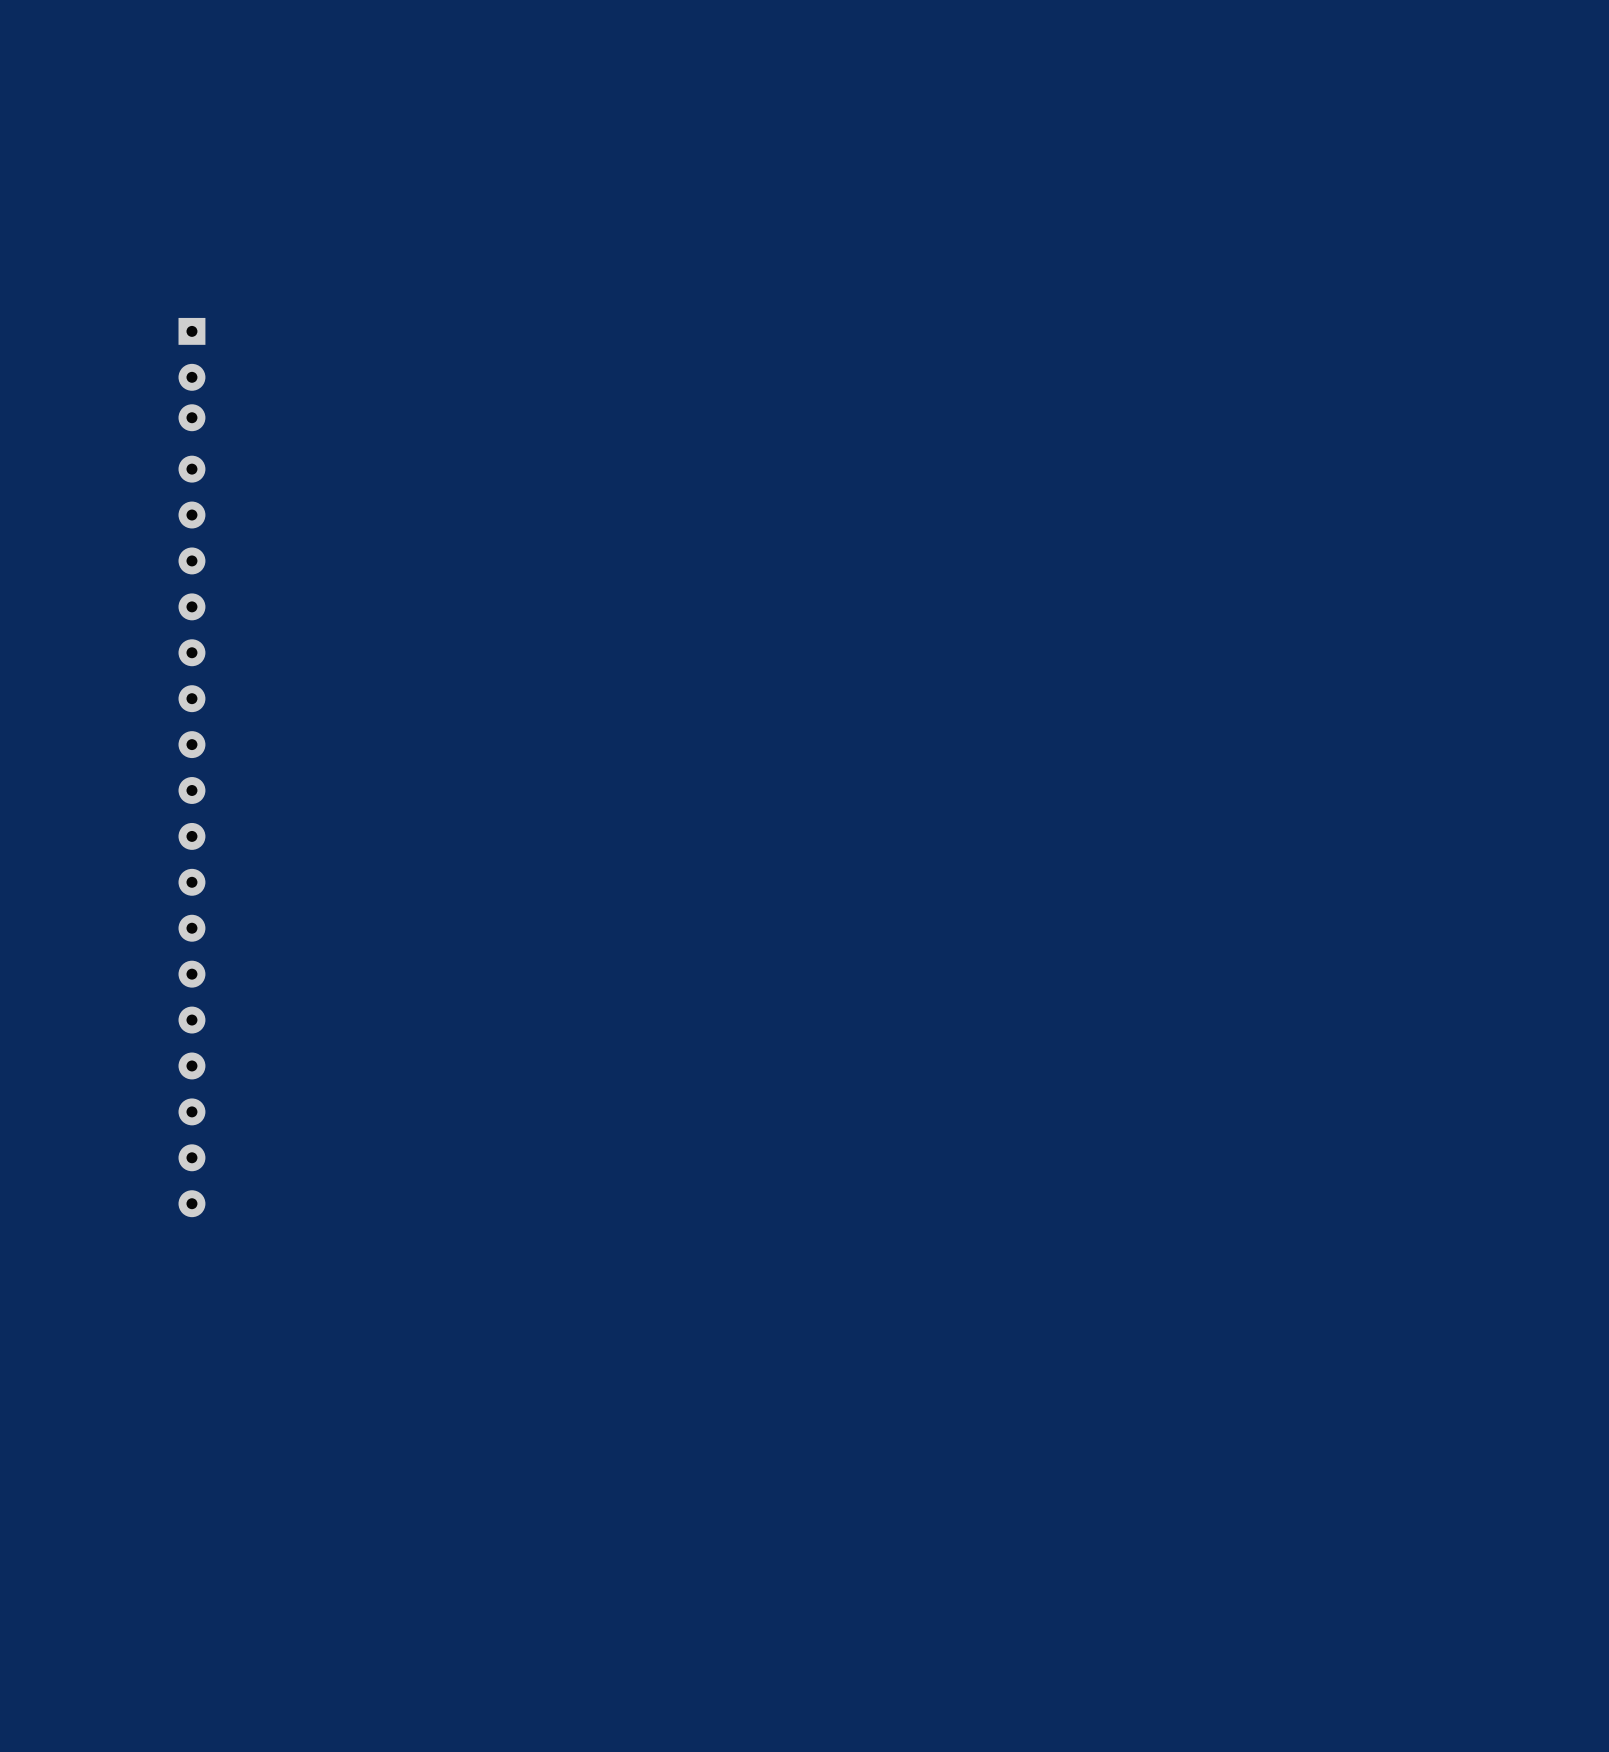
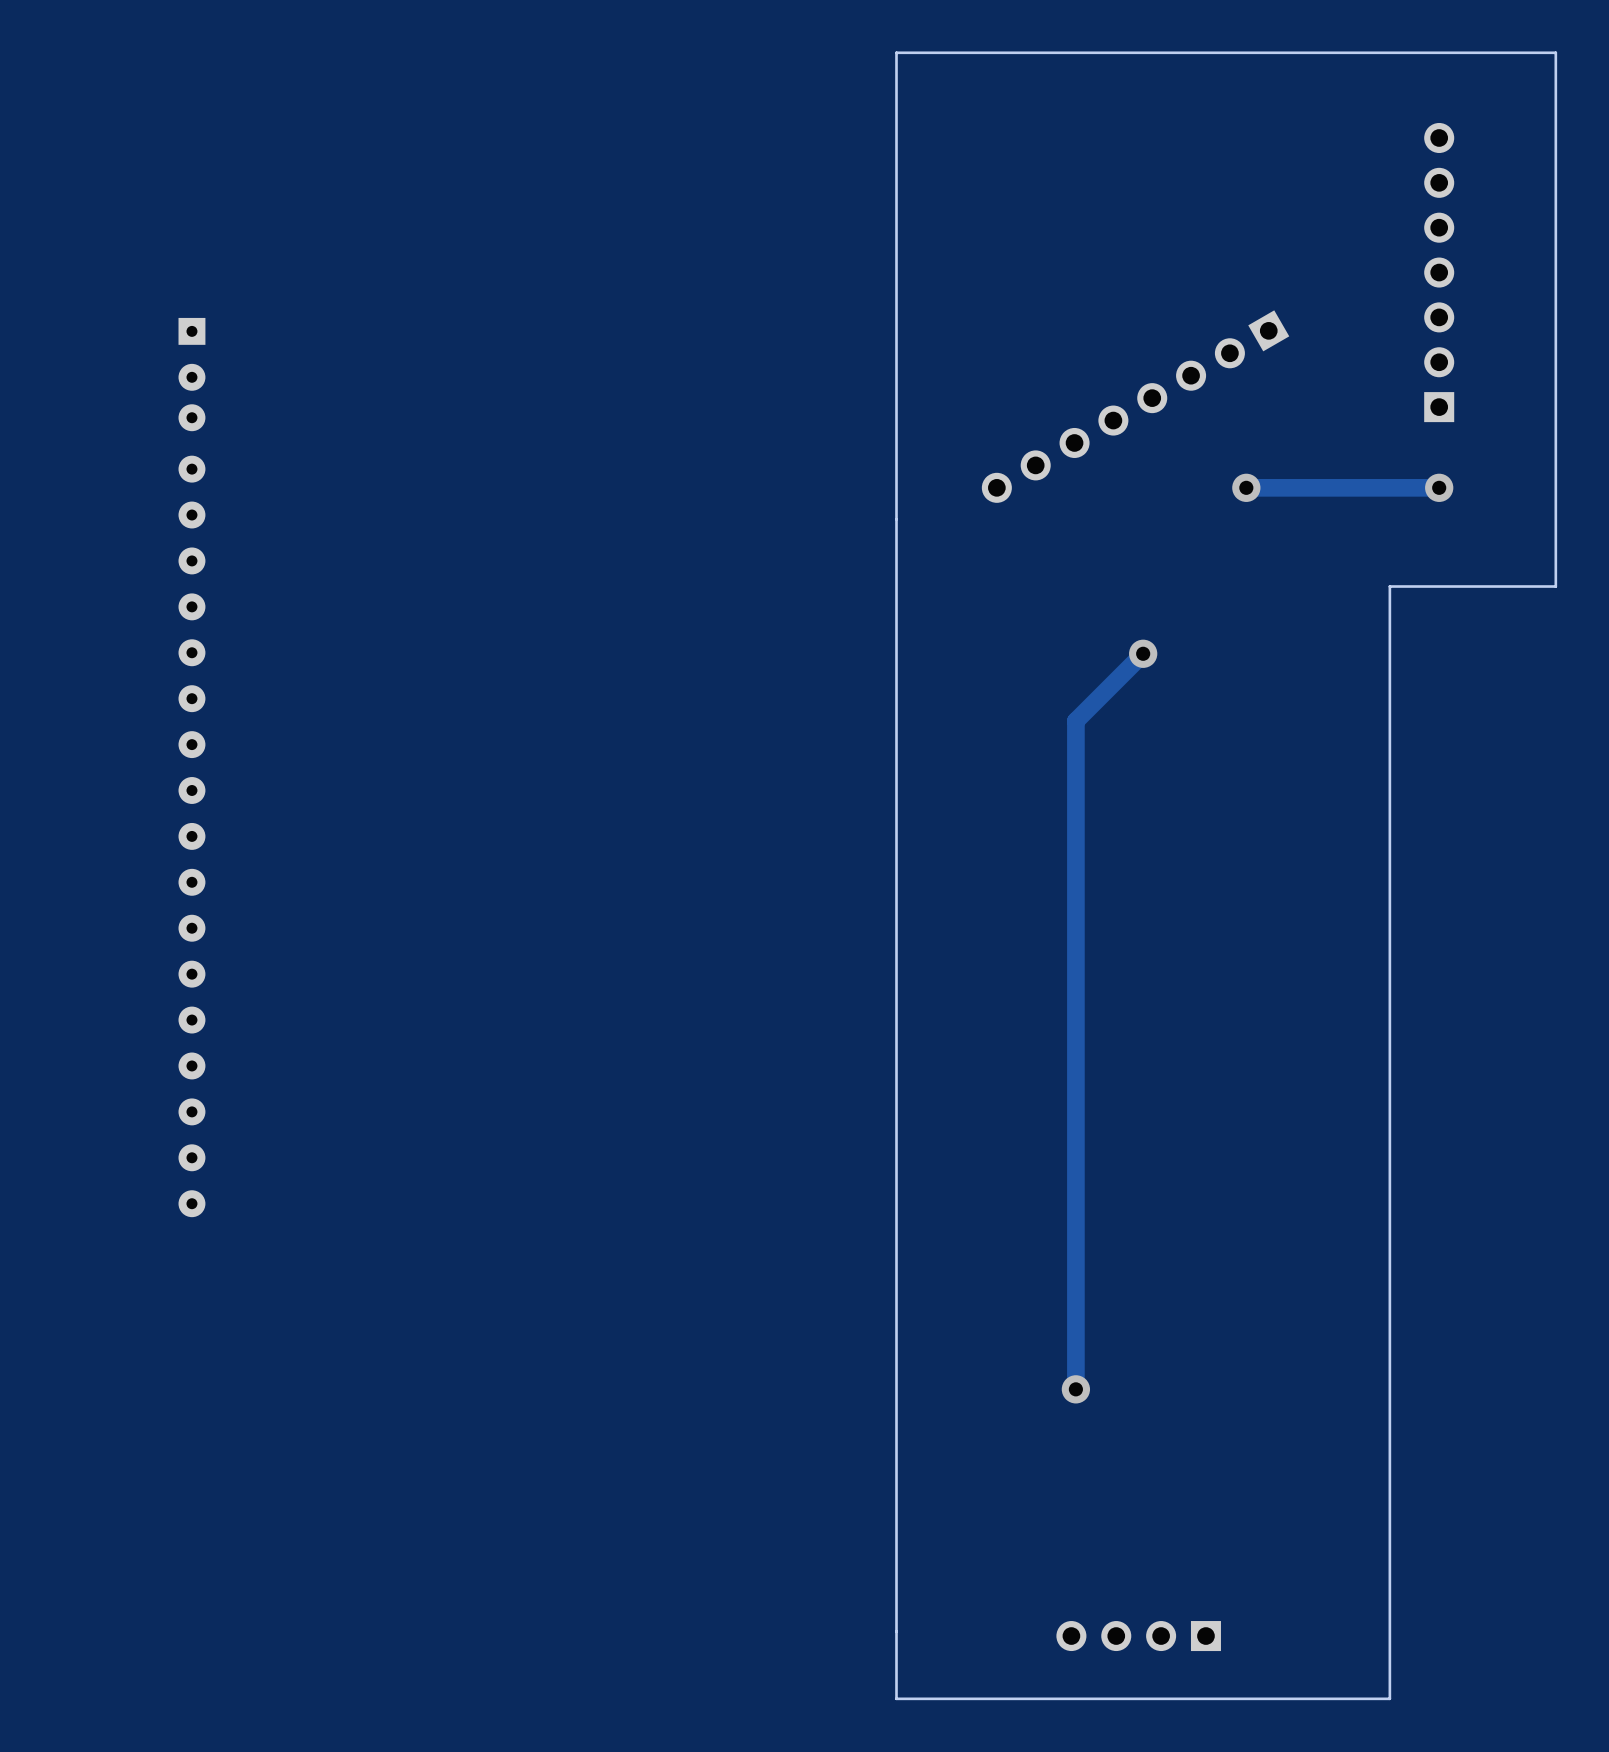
board edge: none -> (1555, 52) (896, 52) (896, 1698) (1389, 1698) (1389, 586) (1555, 586) (1555, 52)
part: none -> (1439, 272)
part: none -> (1135, 406)
via: none -> (1246, 487)
track: none -> (1439, 487) (1246, 487)
via: none -> (1439, 487)
track: none -> (1143, 653) (1075, 721) (1075, 1389)
via: none -> (1143, 653)
via: none -> (1075, 1389)
part: none -> (1138, 1636)

